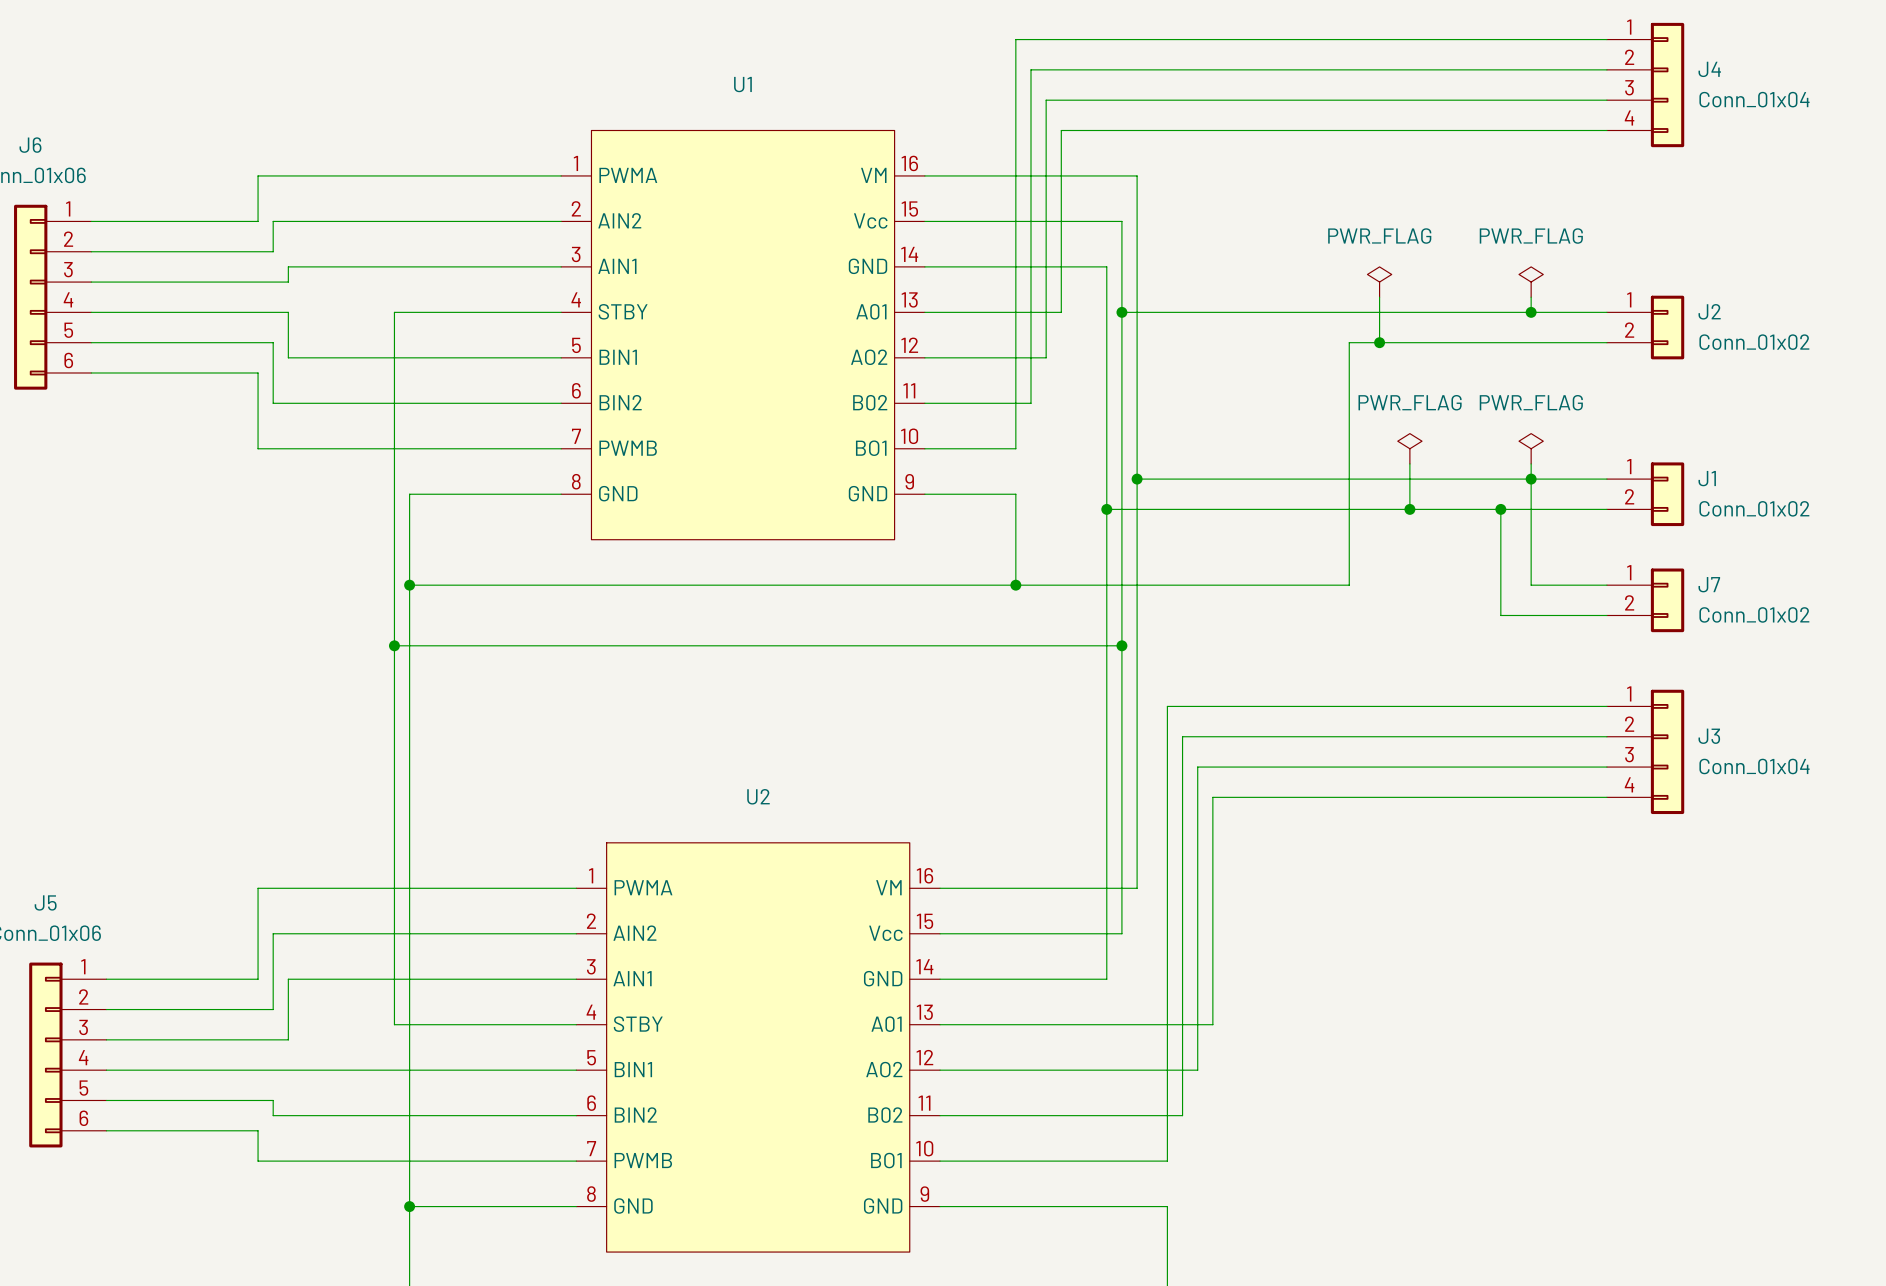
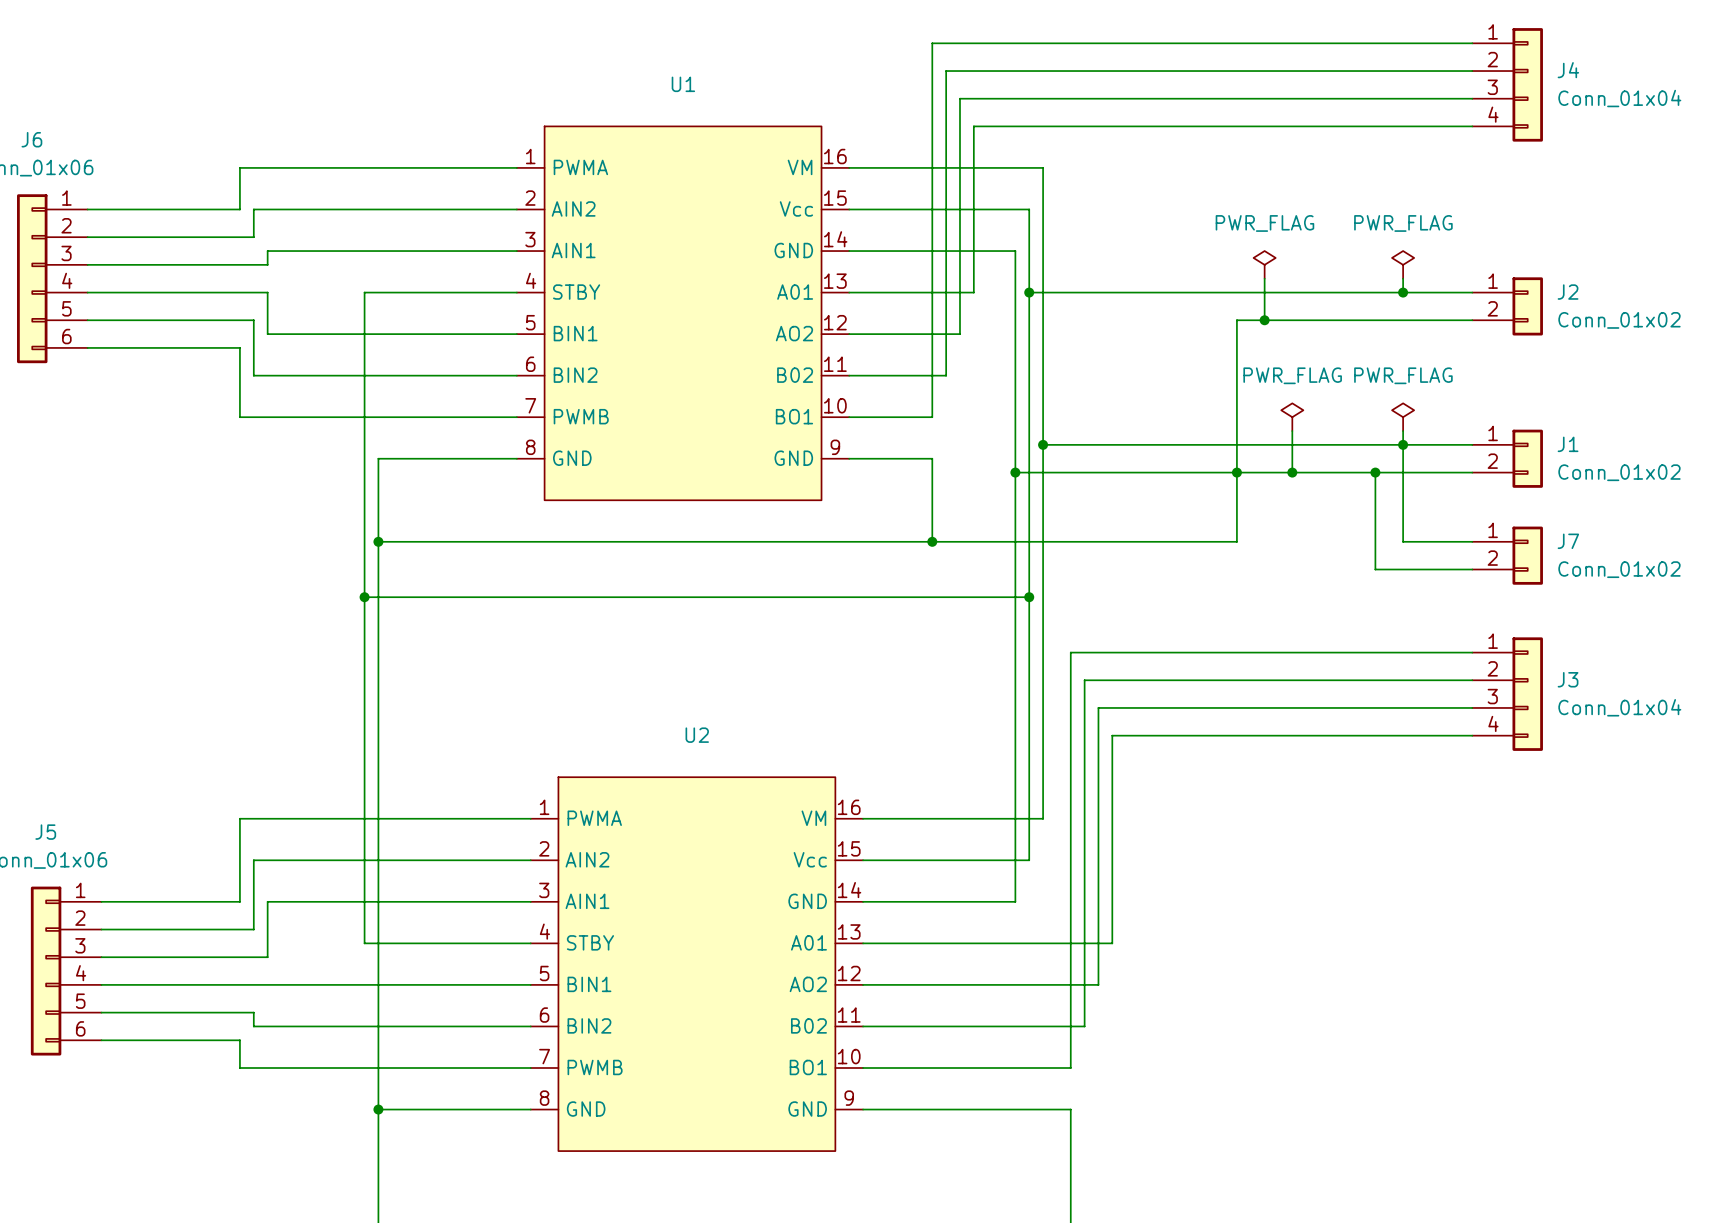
junction: none -> (1236, 472)

